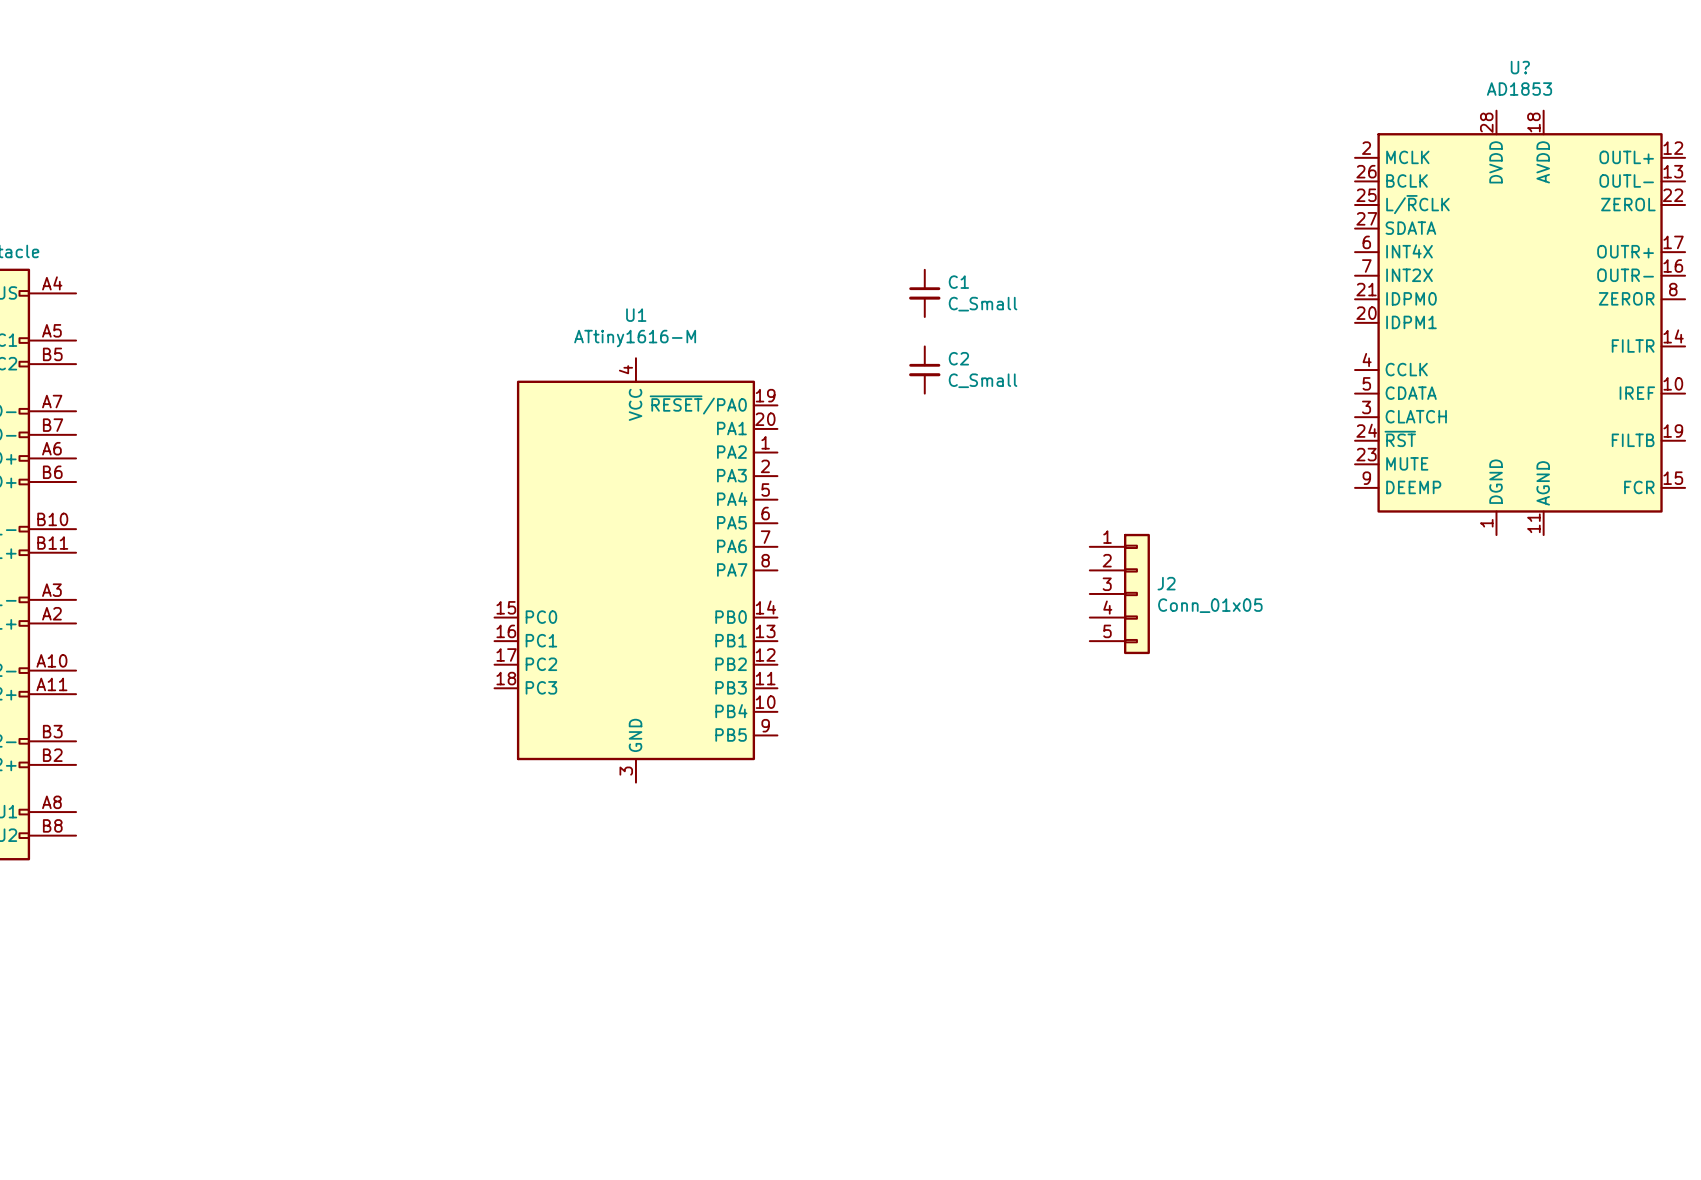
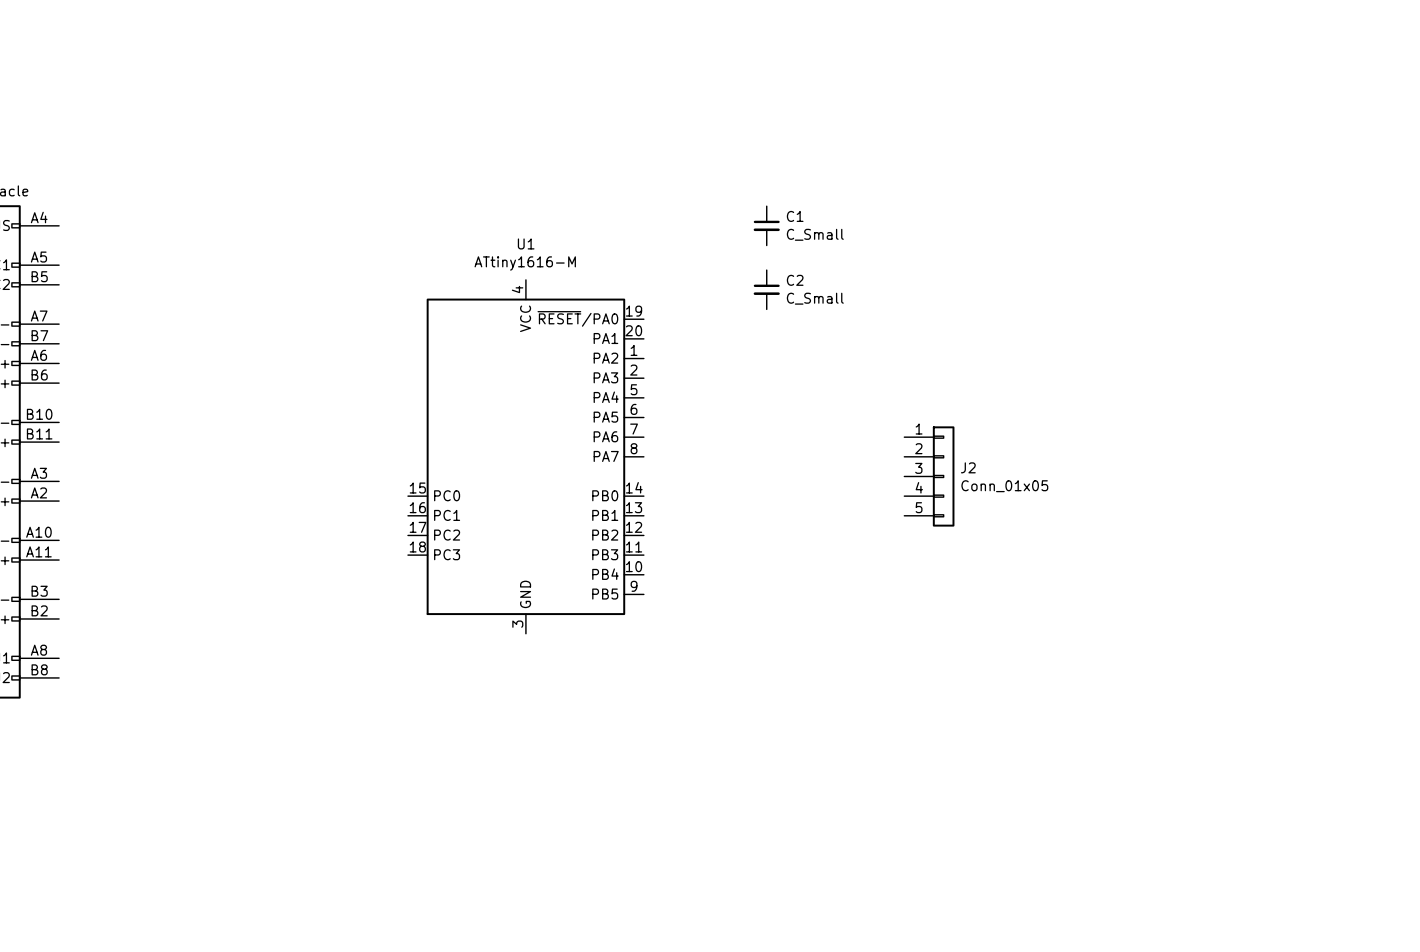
U?: AD1853 (1520, 322) -> none

